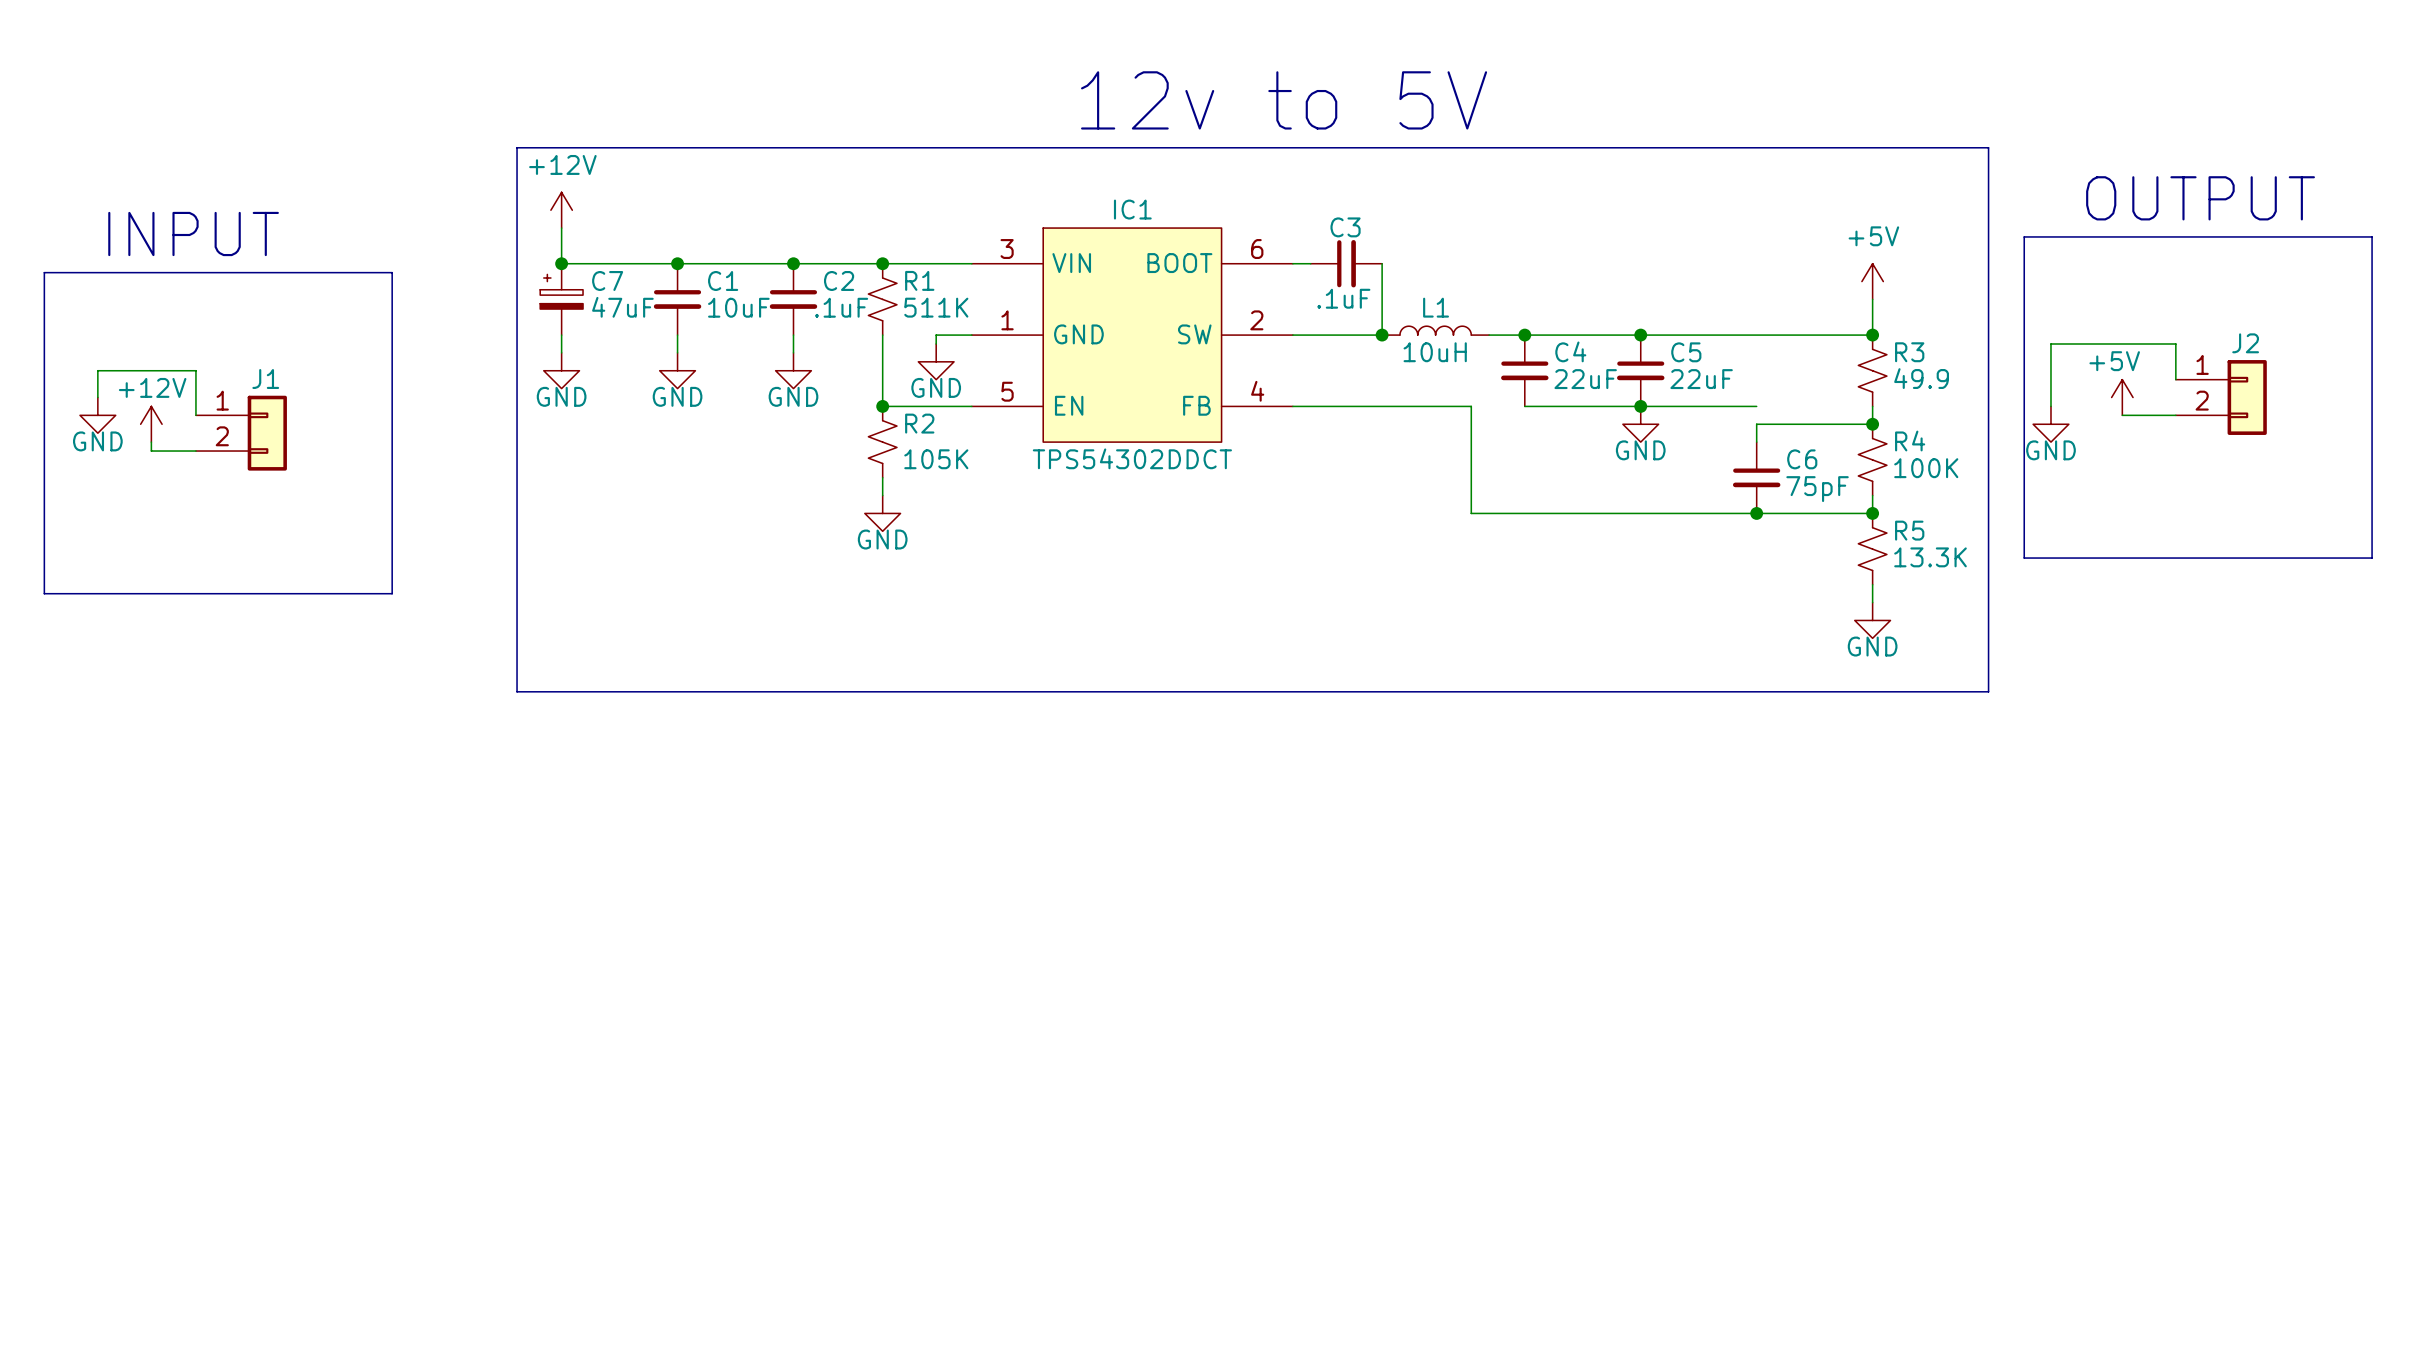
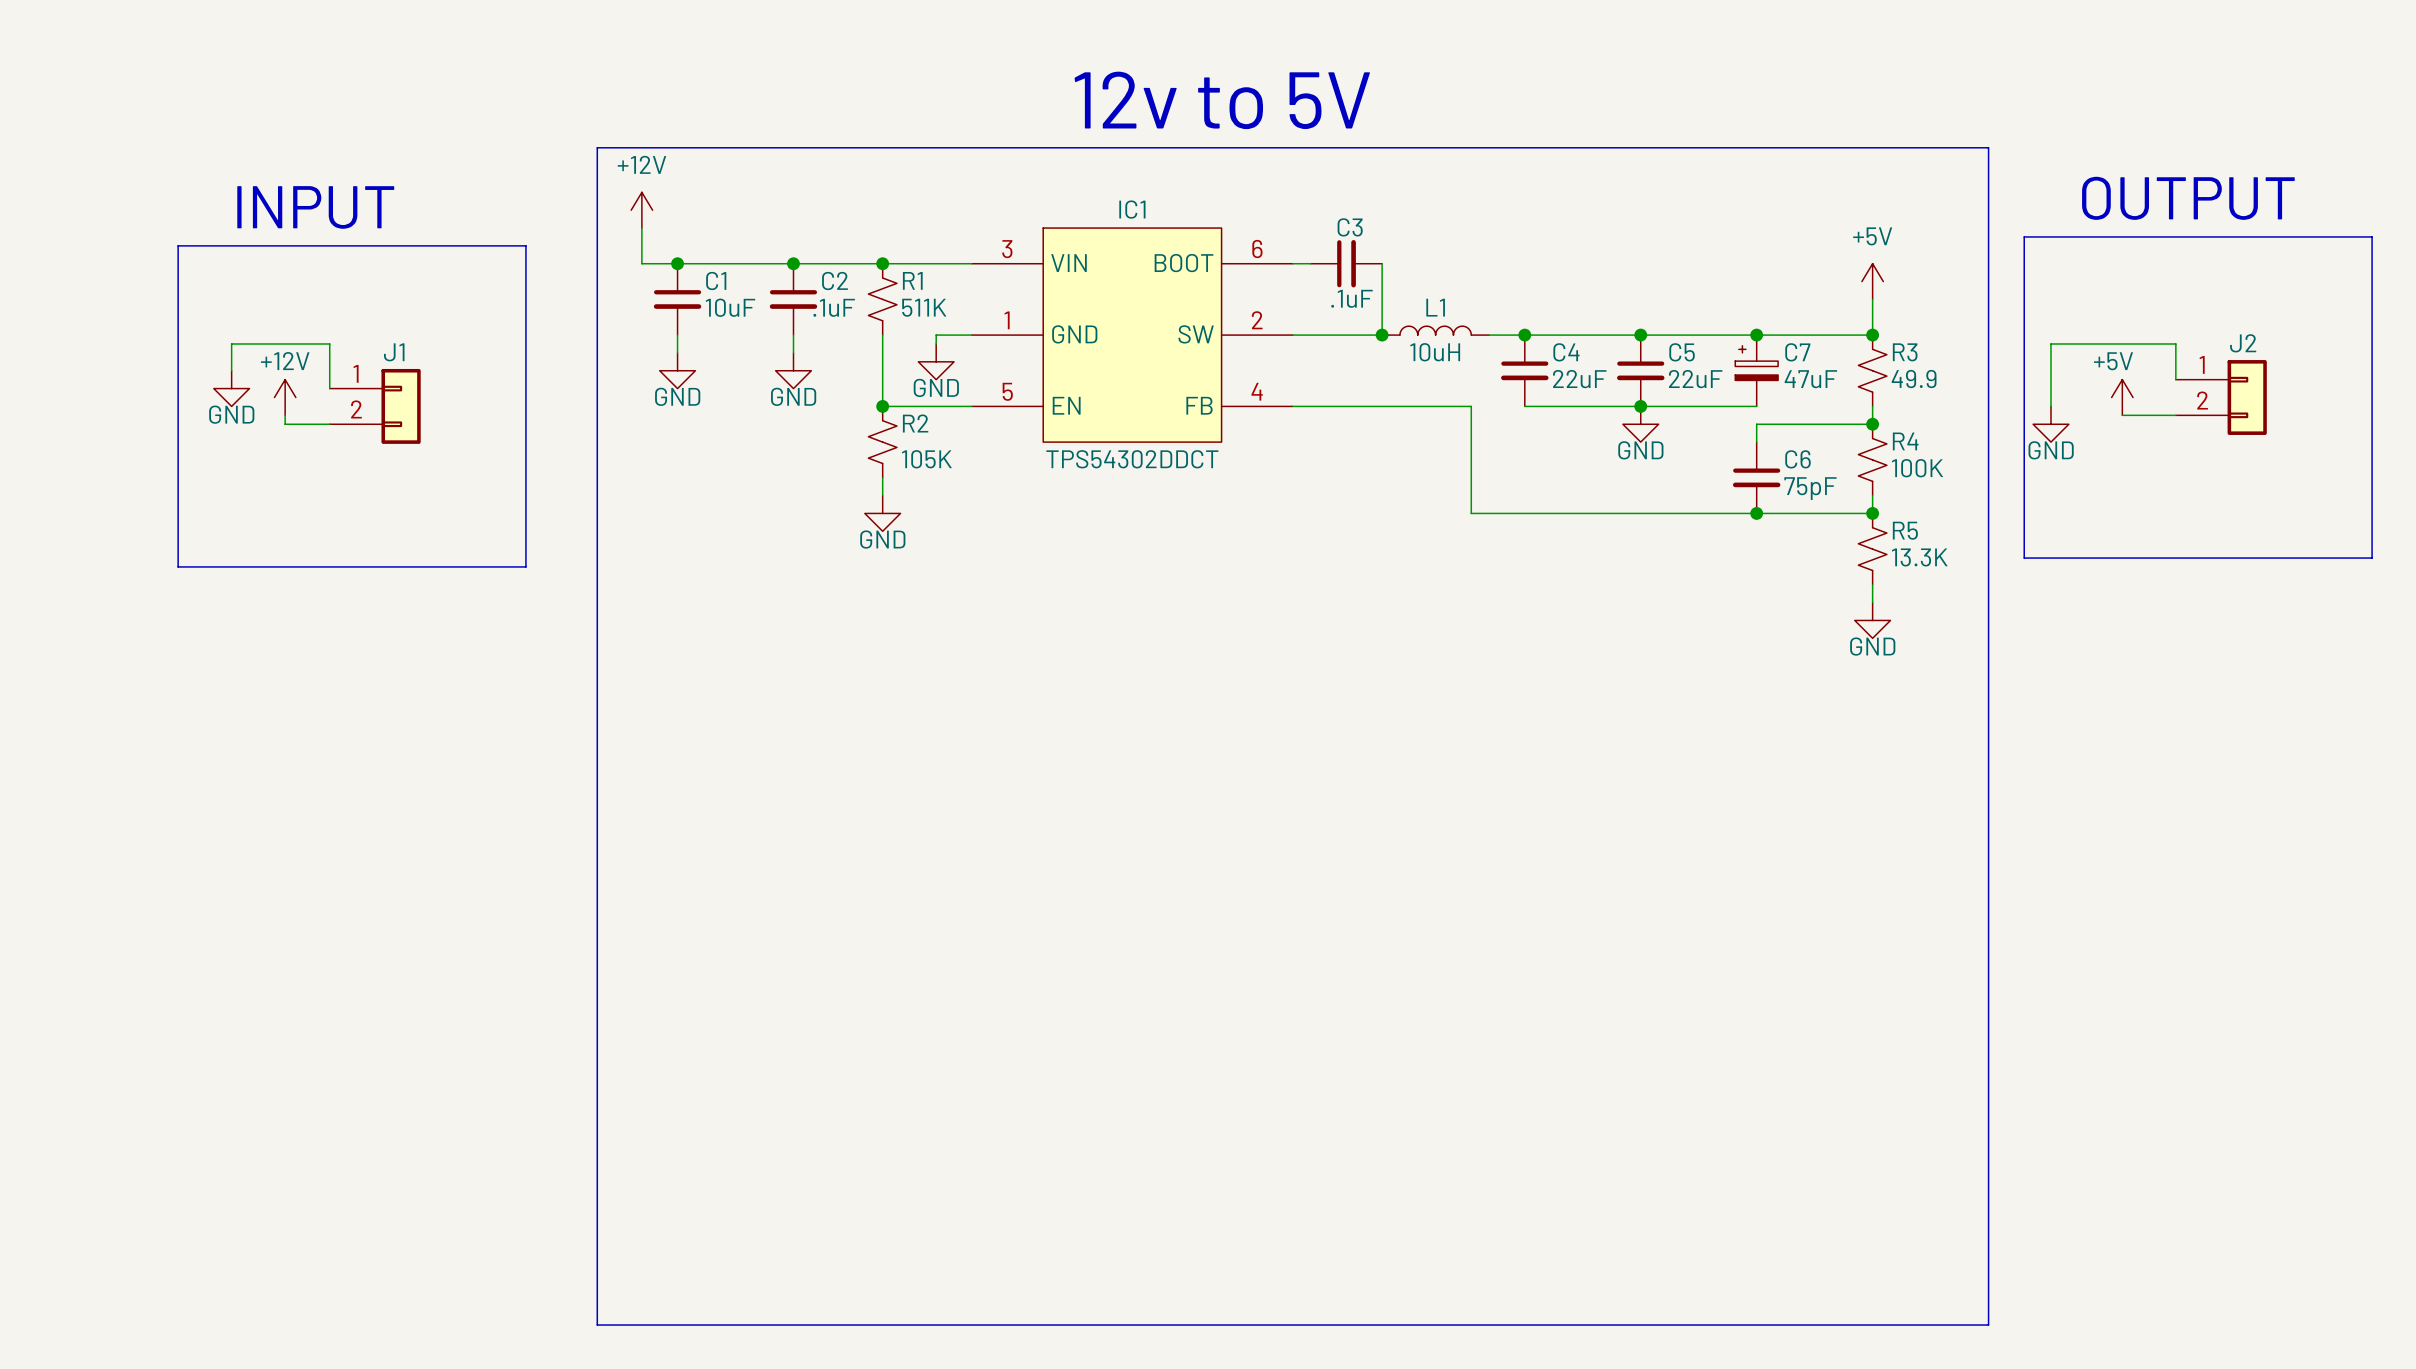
line: (597, 147) (517, 147) (517, 691) (1988, 691) -> (597, 147) (597, 1325) (1988, 1325) (1988, 691)
power symbol position: +12V (561, 210) -> +12V (641, 210)
wire: (561, 228) (561, 263) (641, 263) -> (641, 228) (641, 263)
text position: INPUT (193, 233) -> INPUT (315, 207)
junction: (561, 263) -> none
line: (44, 272) (392, 272) (392, 593) (44, 593) (44, 272) -> (178, 245) (525, 245) (525, 566) (178, 566) (178, 245)
C7 position: (561, 299) -> (1756, 370)
wire: (561, 335) (561, 352) -> none
junction: none -> (1756, 335)
power symbol: GND (561, 370) -> none
wire: (97, 397) (97, 370) (195, 370) (195, 415) -> (231, 370) (231, 343) (329, 343) (329, 388)
power symbol position: GND (97, 415) -> GND (231, 388)
power symbol position: +12V (151, 424) -> +12V (285, 397)
J1 position: (241, 433) -> (375, 406)
wire: (151, 442) (151, 451) (195, 451) -> (285, 415) (285, 424) (329, 424)

